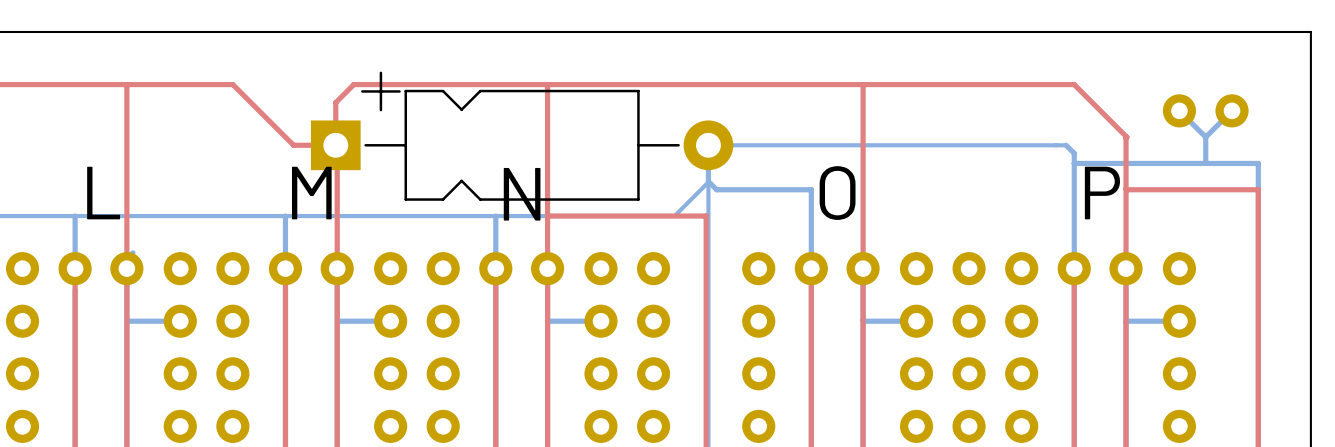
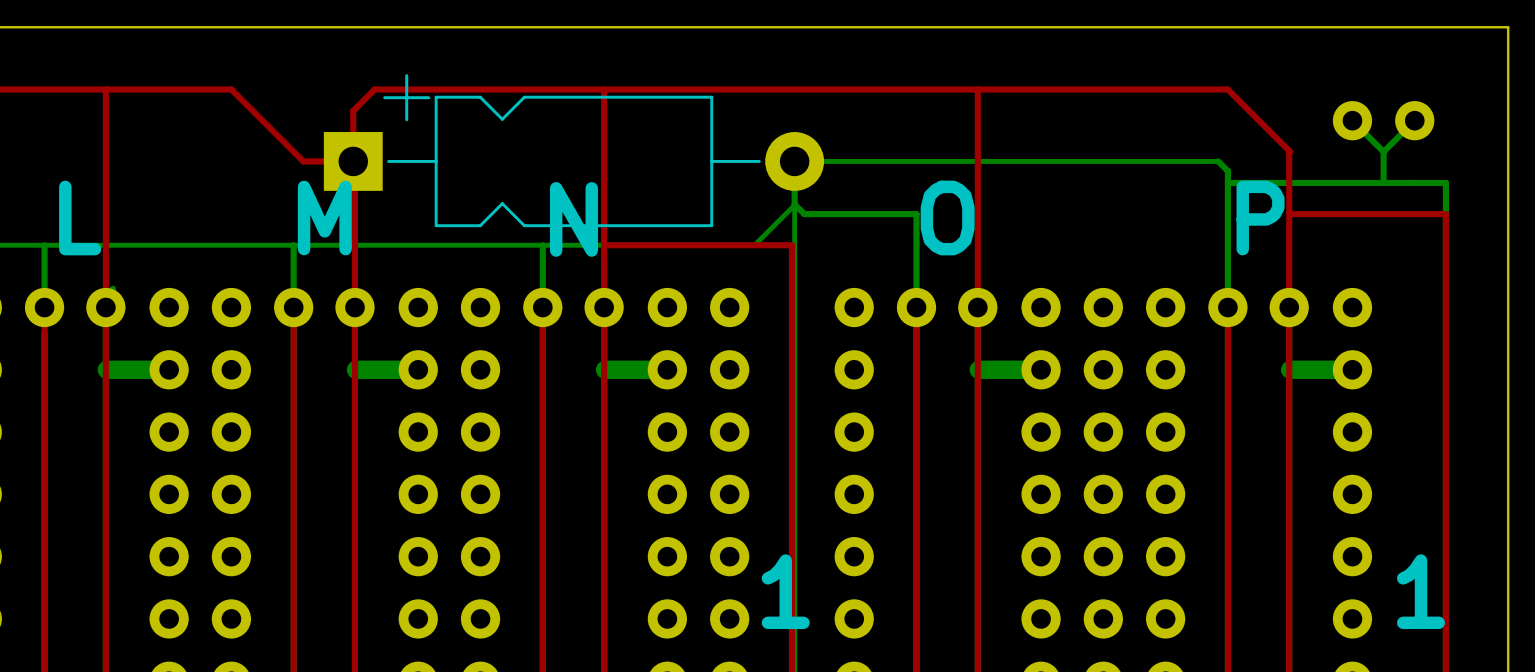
bottom track width: thin (127, 321) (180, 321) -> thick (106, 369) (169, 369)
bottom track width: thin (338, 321) (390, 321) -> thick (355, 369) (418, 369)
bottom track width: thin (548, 321) (600, 321) -> thick (605, 369) (667, 369)
bottom track width: thin (863, 321) (916, 321) -> thick (978, 369) (1041, 369)
bottom track width: thin (1126, 321) (1179, 321) -> thick (1290, 369) (1352, 369)

